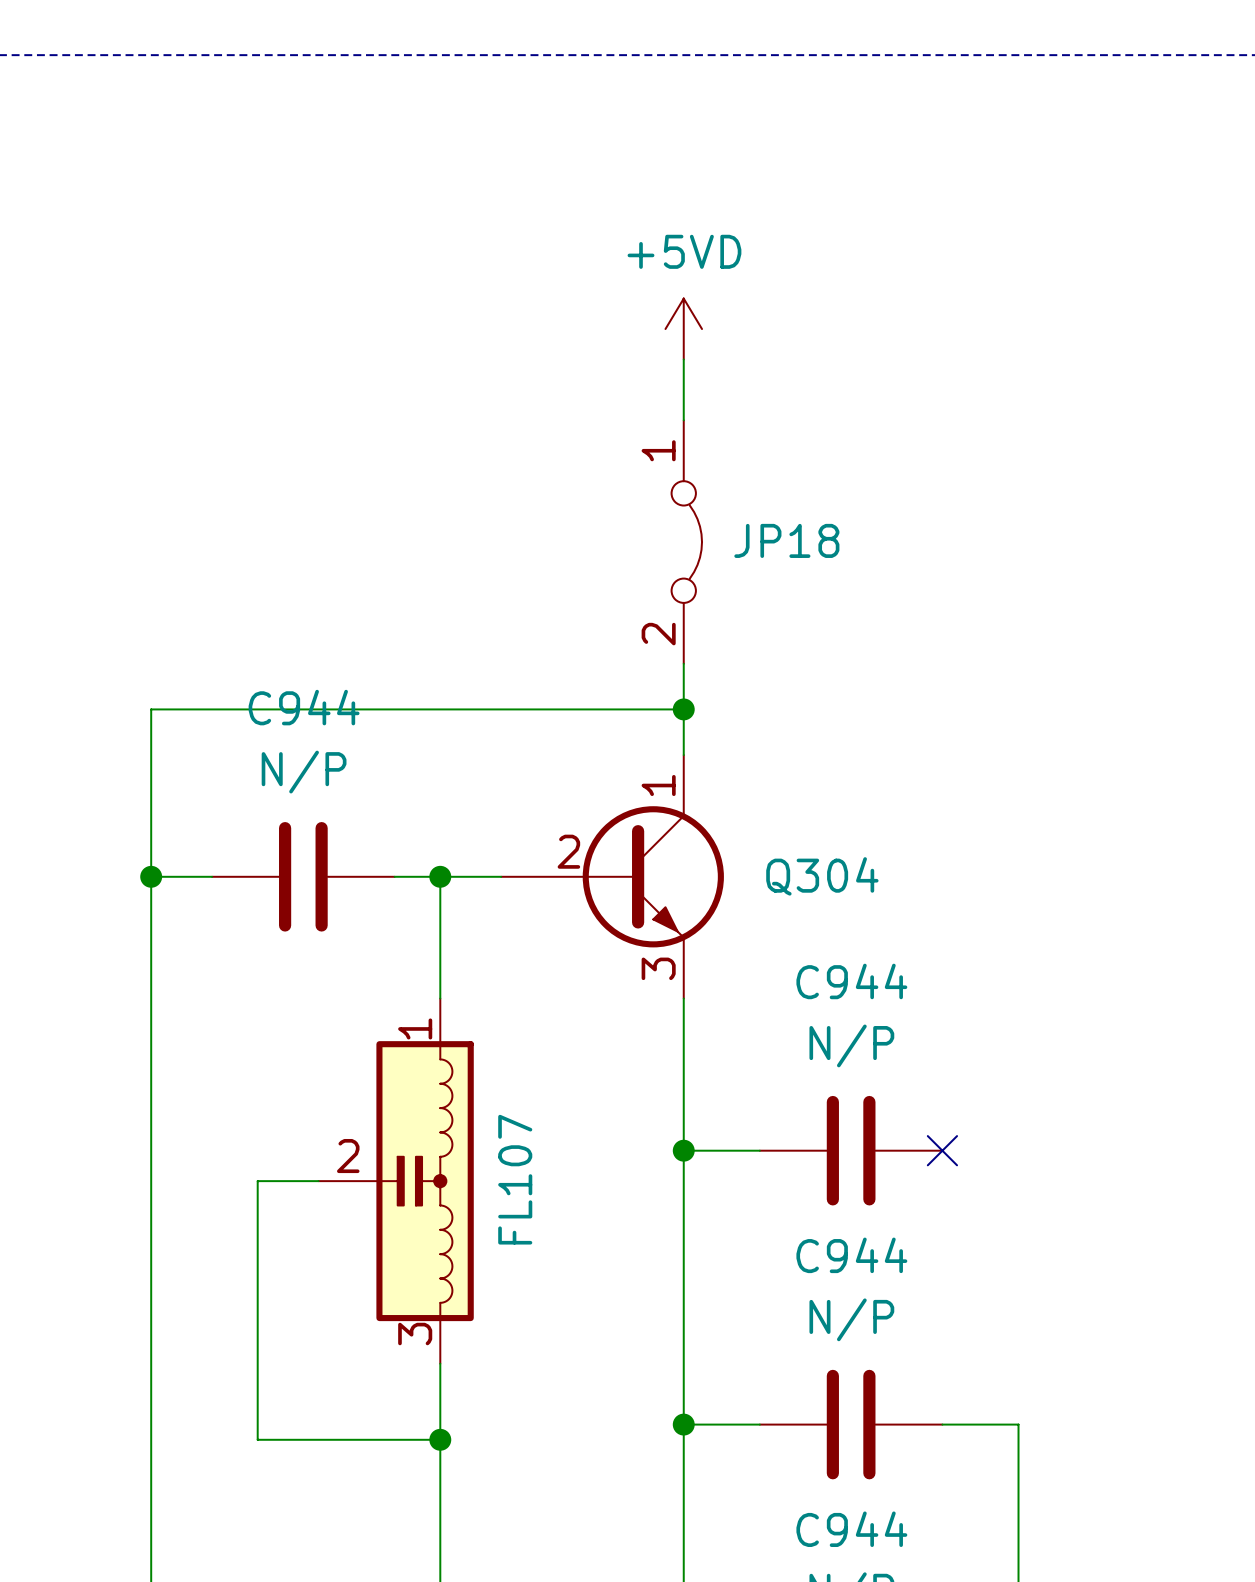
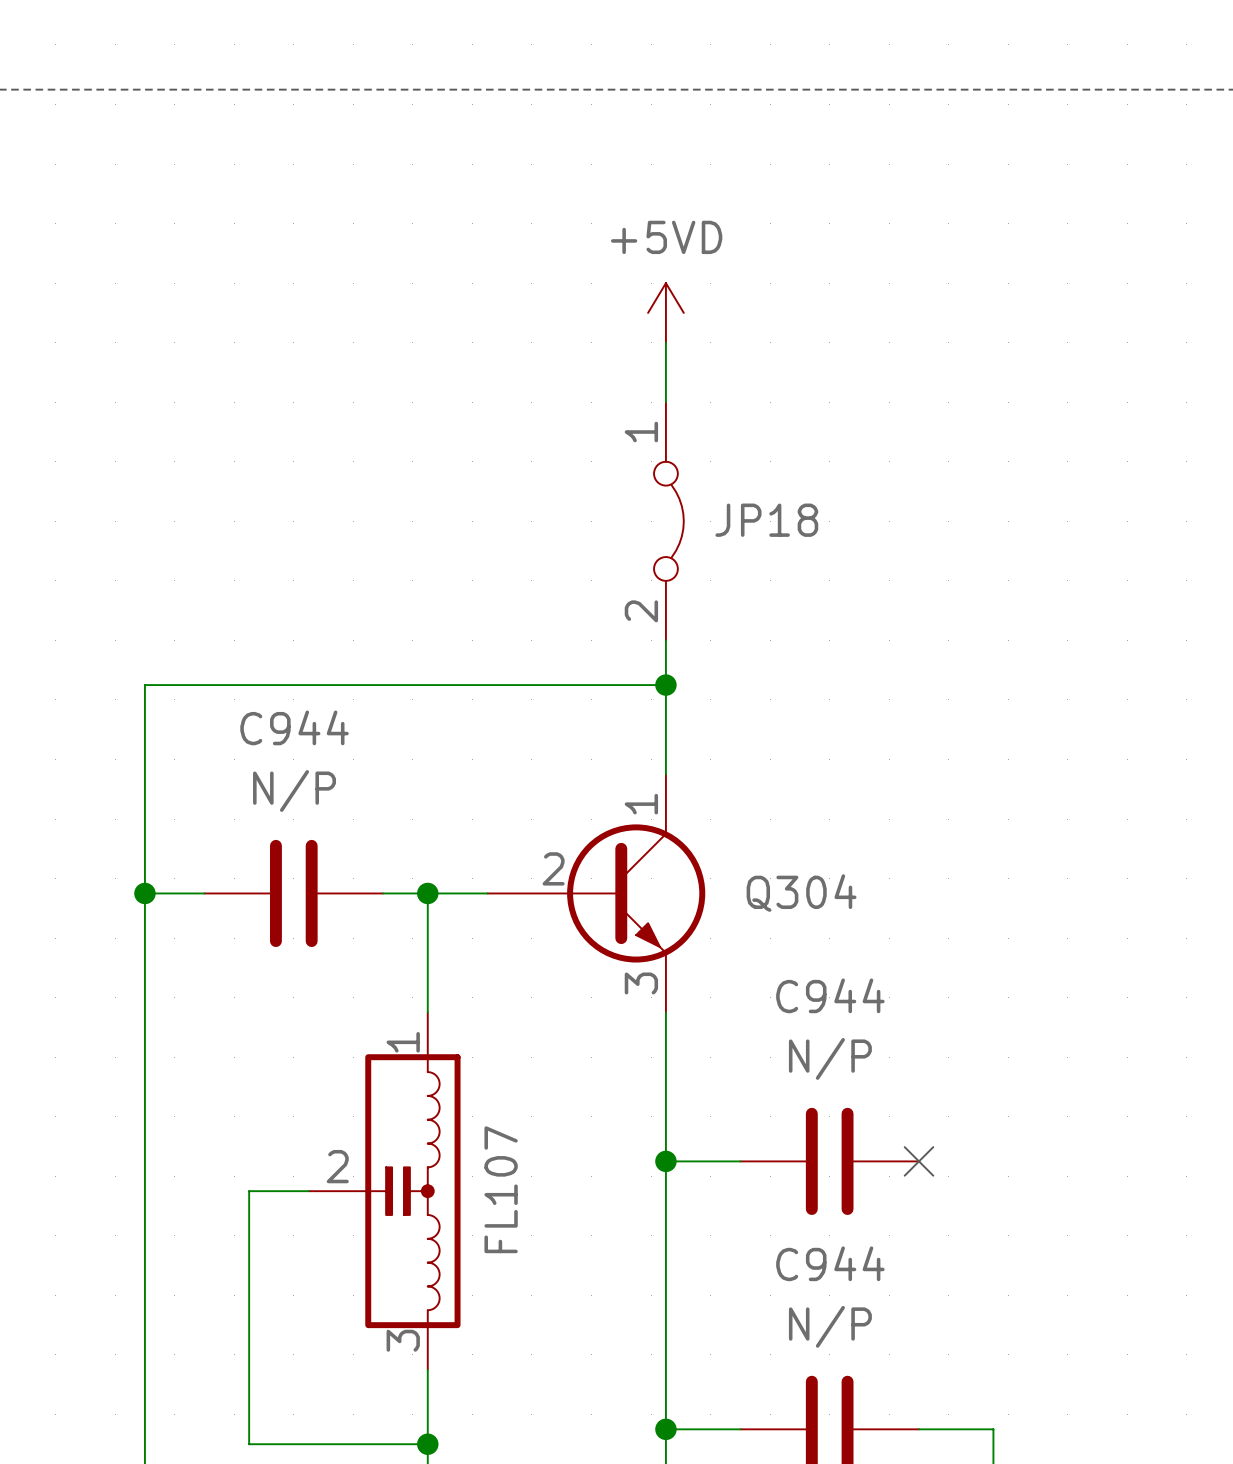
power symbol position: +5VD (683, 329) -> +5VD (665, 312)
JP18 position: (686, 542) -> (668, 521)
wire: (151, 709) (683, 709) -> (144, 729) (144, 685) (665, 685) (665, 640)
junction position: (683, 709) -> (665, 685)

